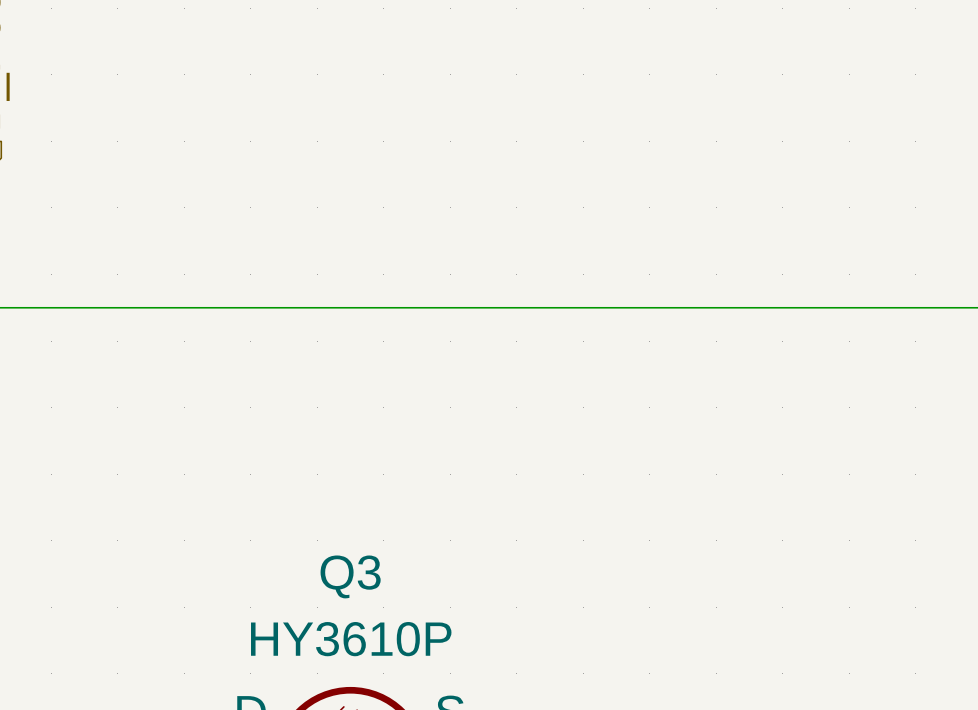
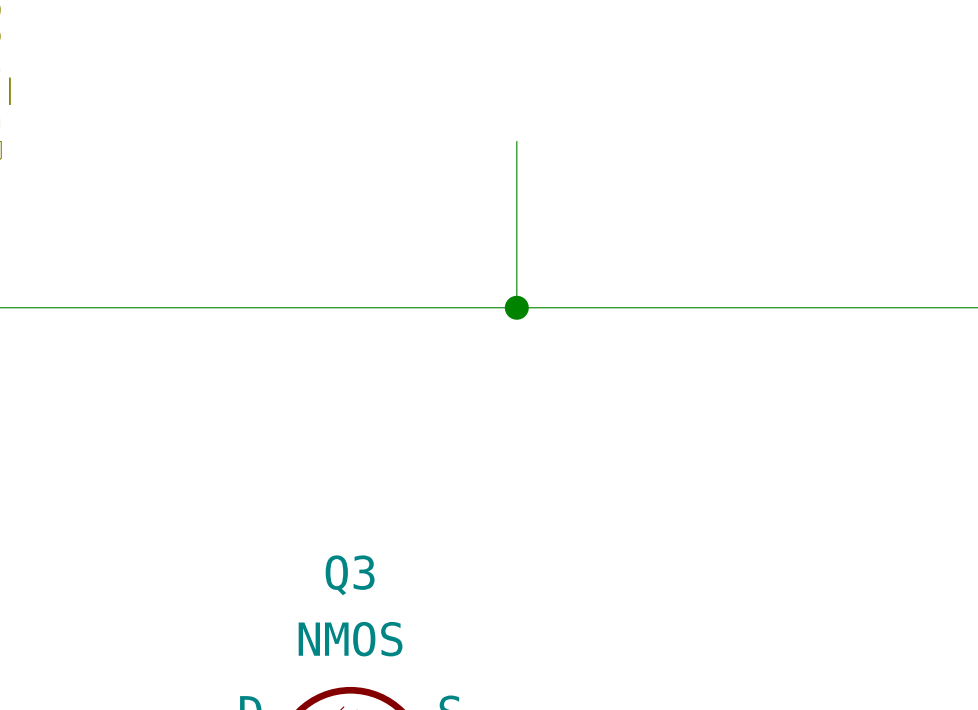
wire: none -> (516, 141) (516, 307)
junction: none -> (516, 307)
Q3 value: HY3610P (351, 639) -> NMOS (350, 639)

